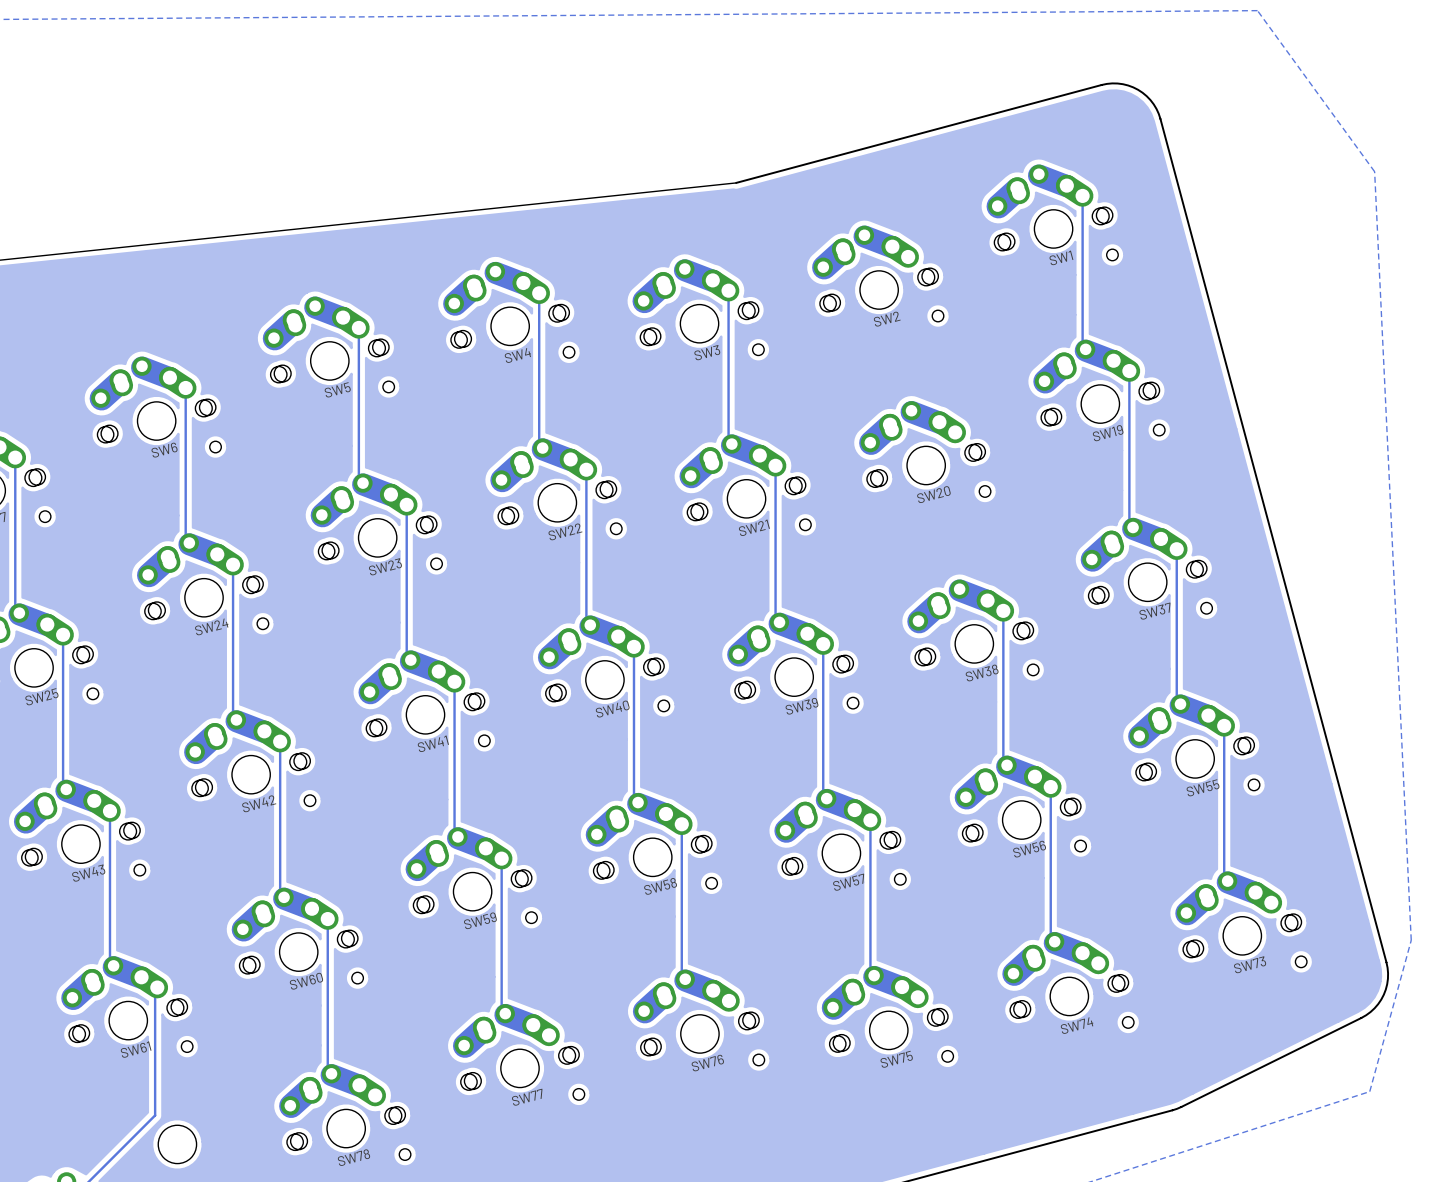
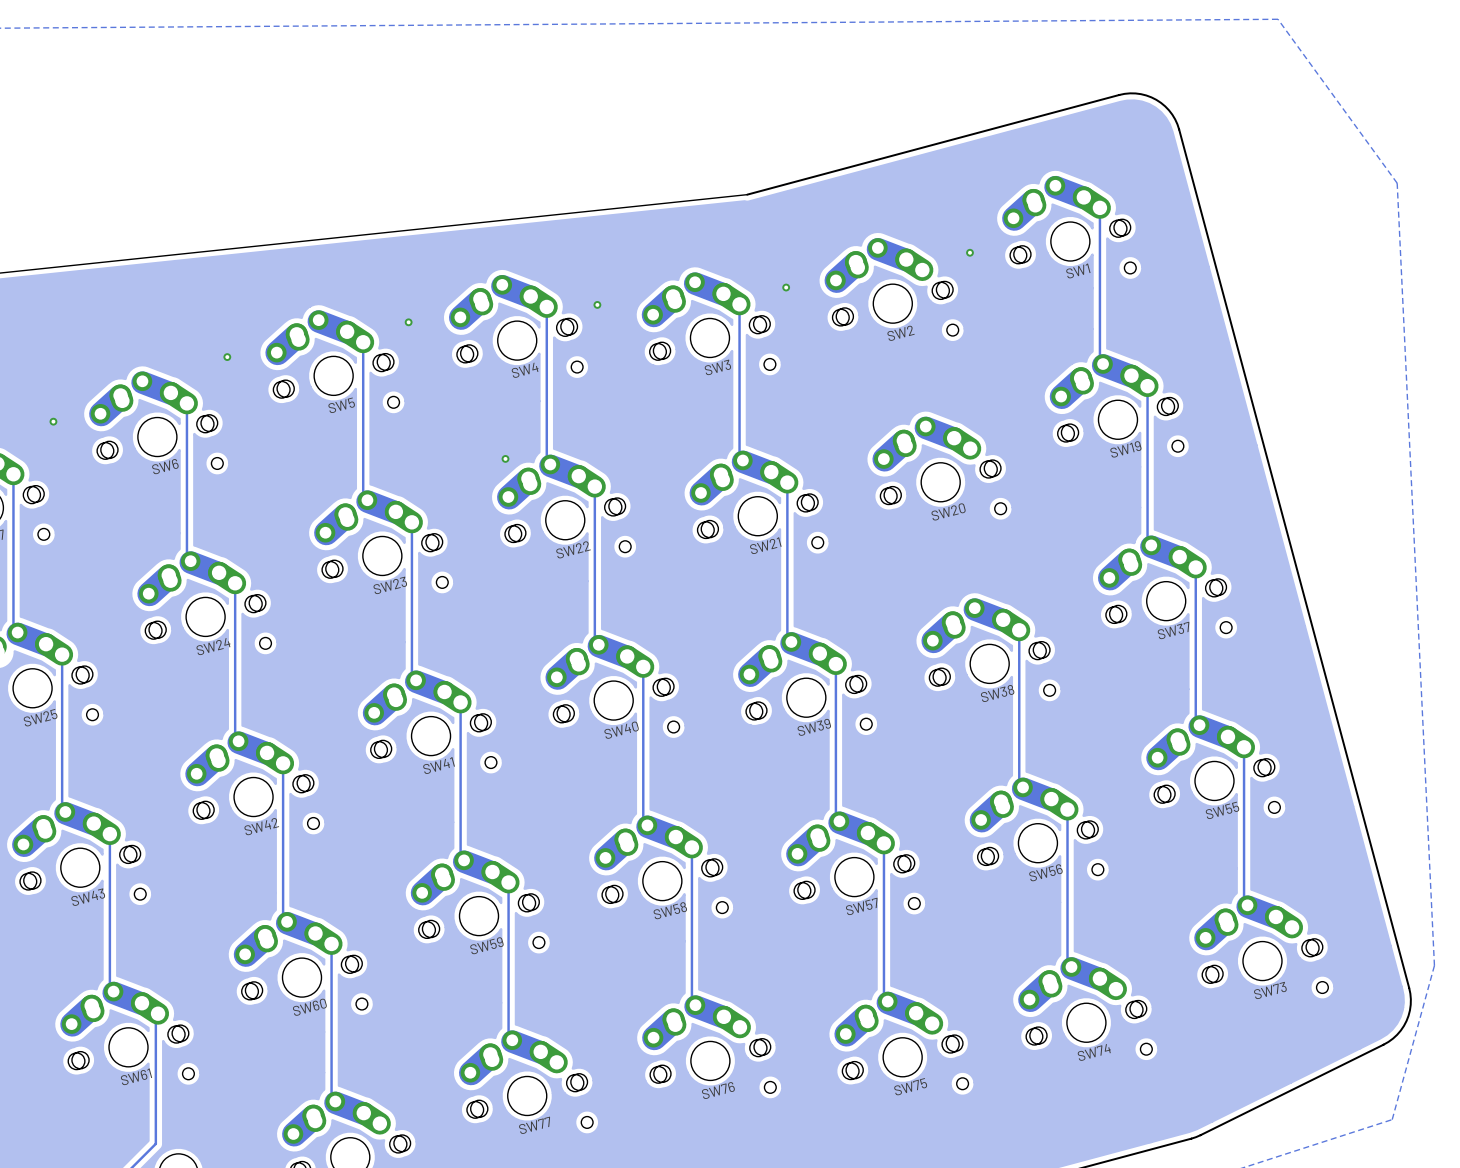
via: none -> (969, 252)
via: none -> (786, 287)
via: none -> (597, 304)
via: none -> (408, 322)
via: none -> (227, 357)
via: none -> (53, 421)
via: none -> (505, 458)

